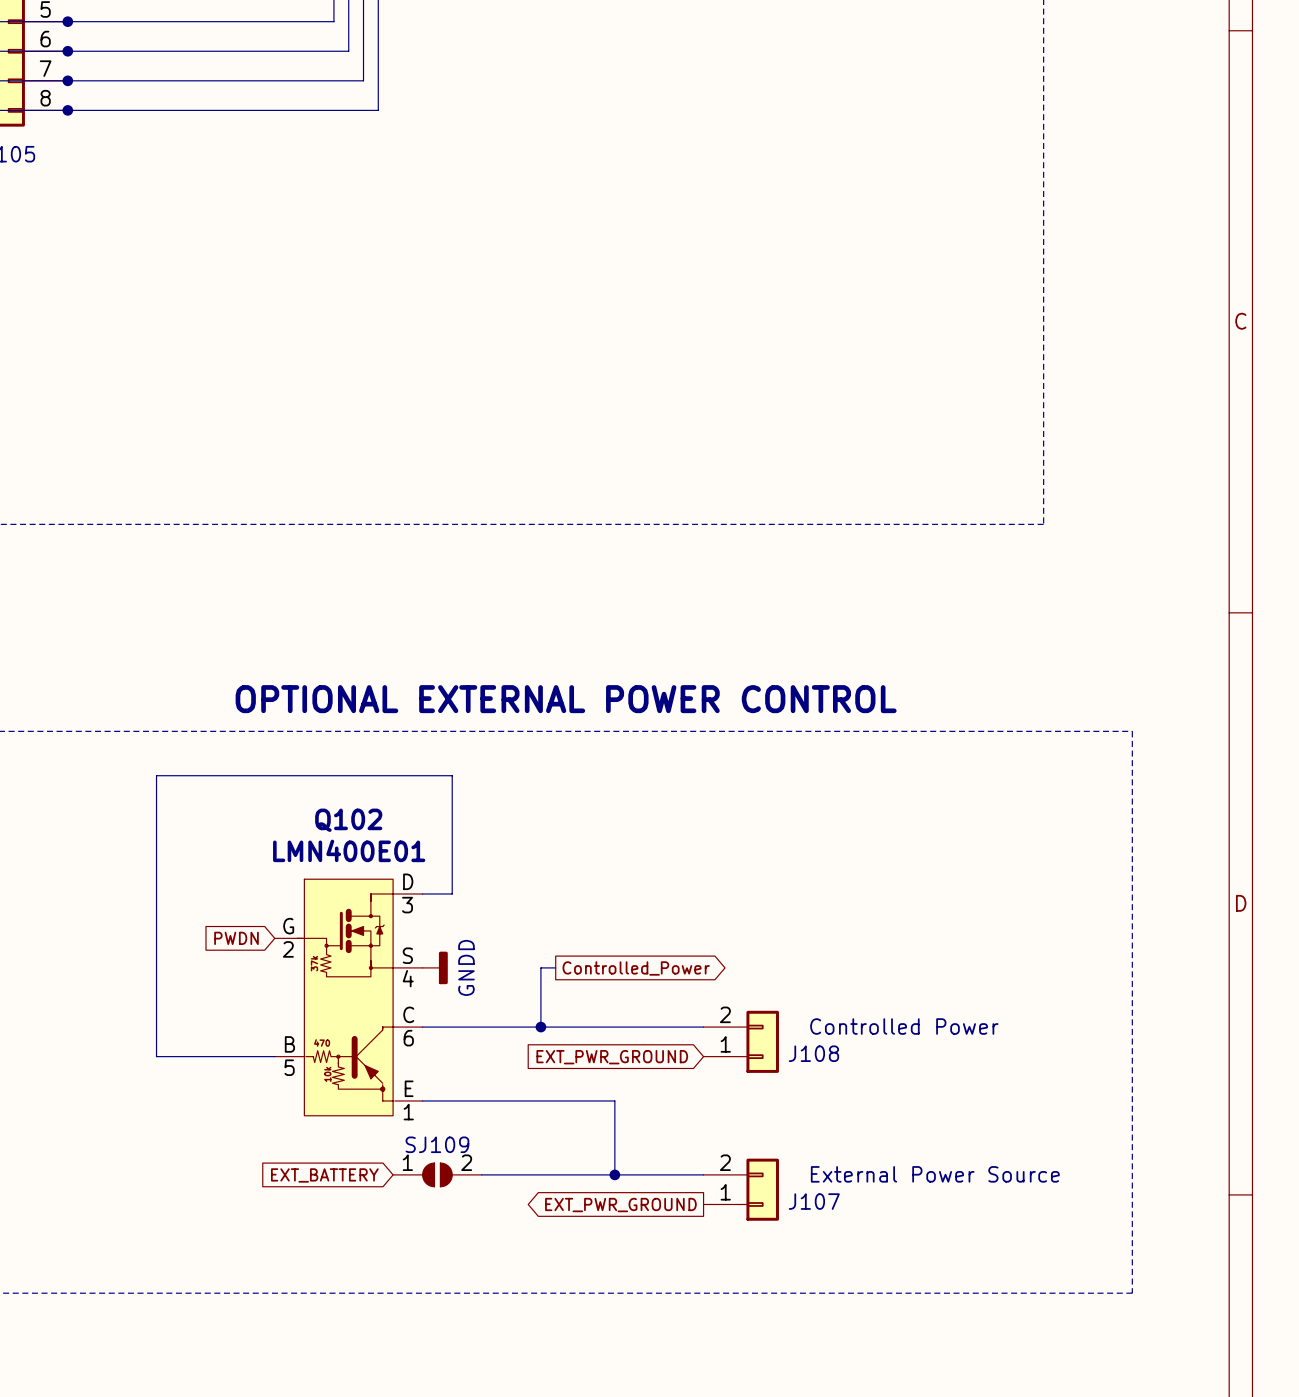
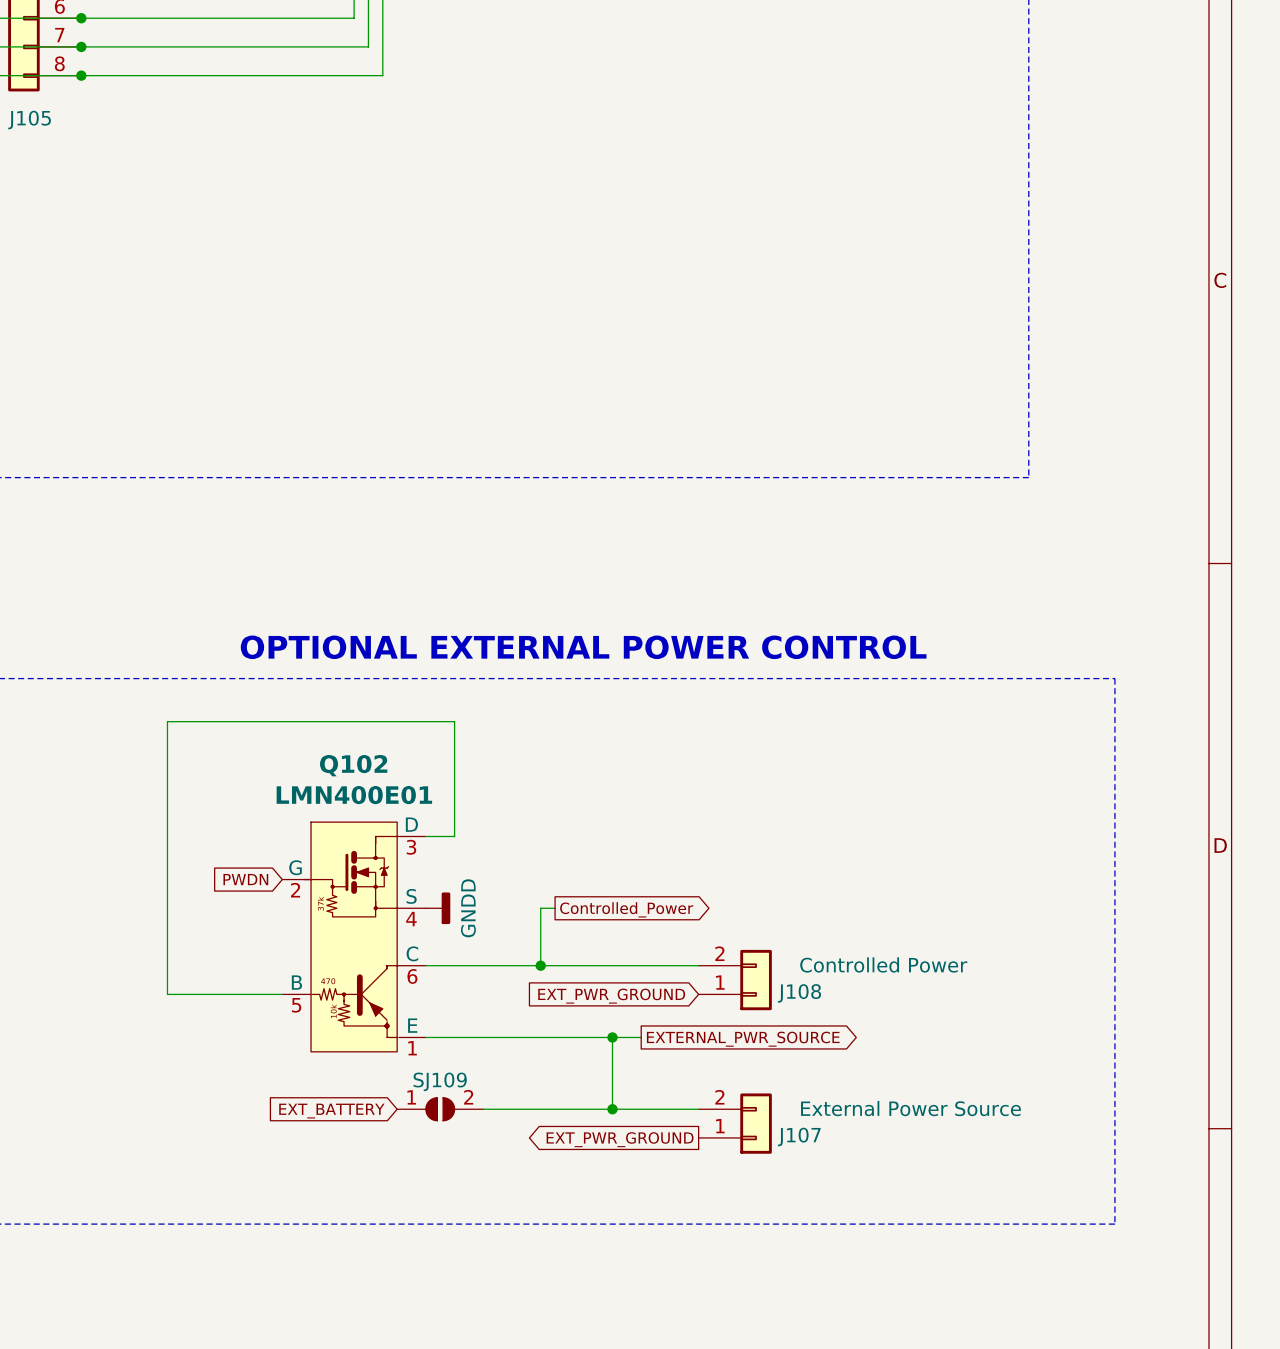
wire: none -> (612, 1037) (641, 1037)
junction: none -> (612, 1037)
global label: none -> EXTERNAL_PWR_SOURCE (743, 1039)

